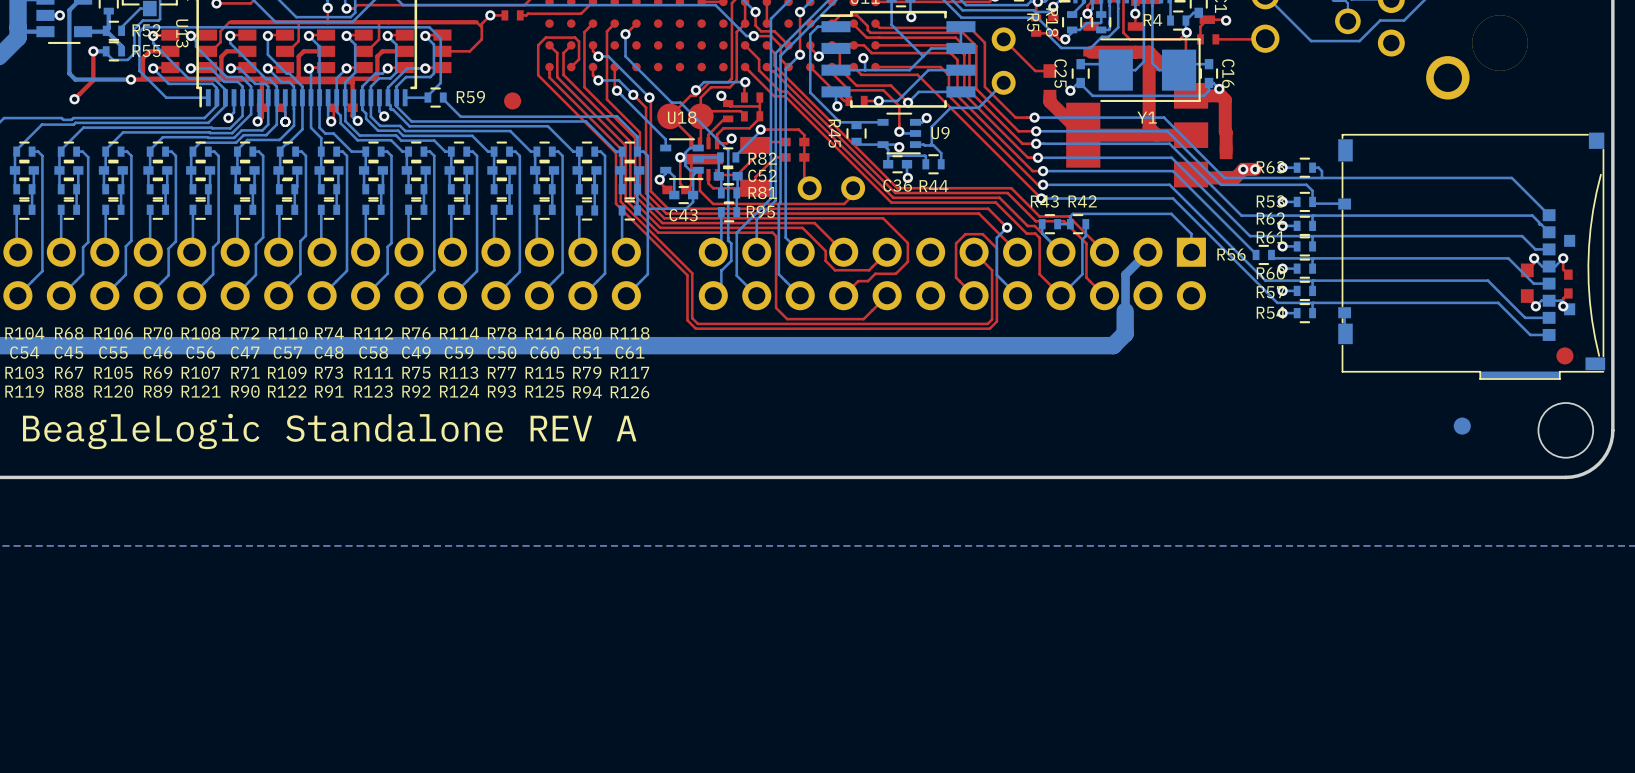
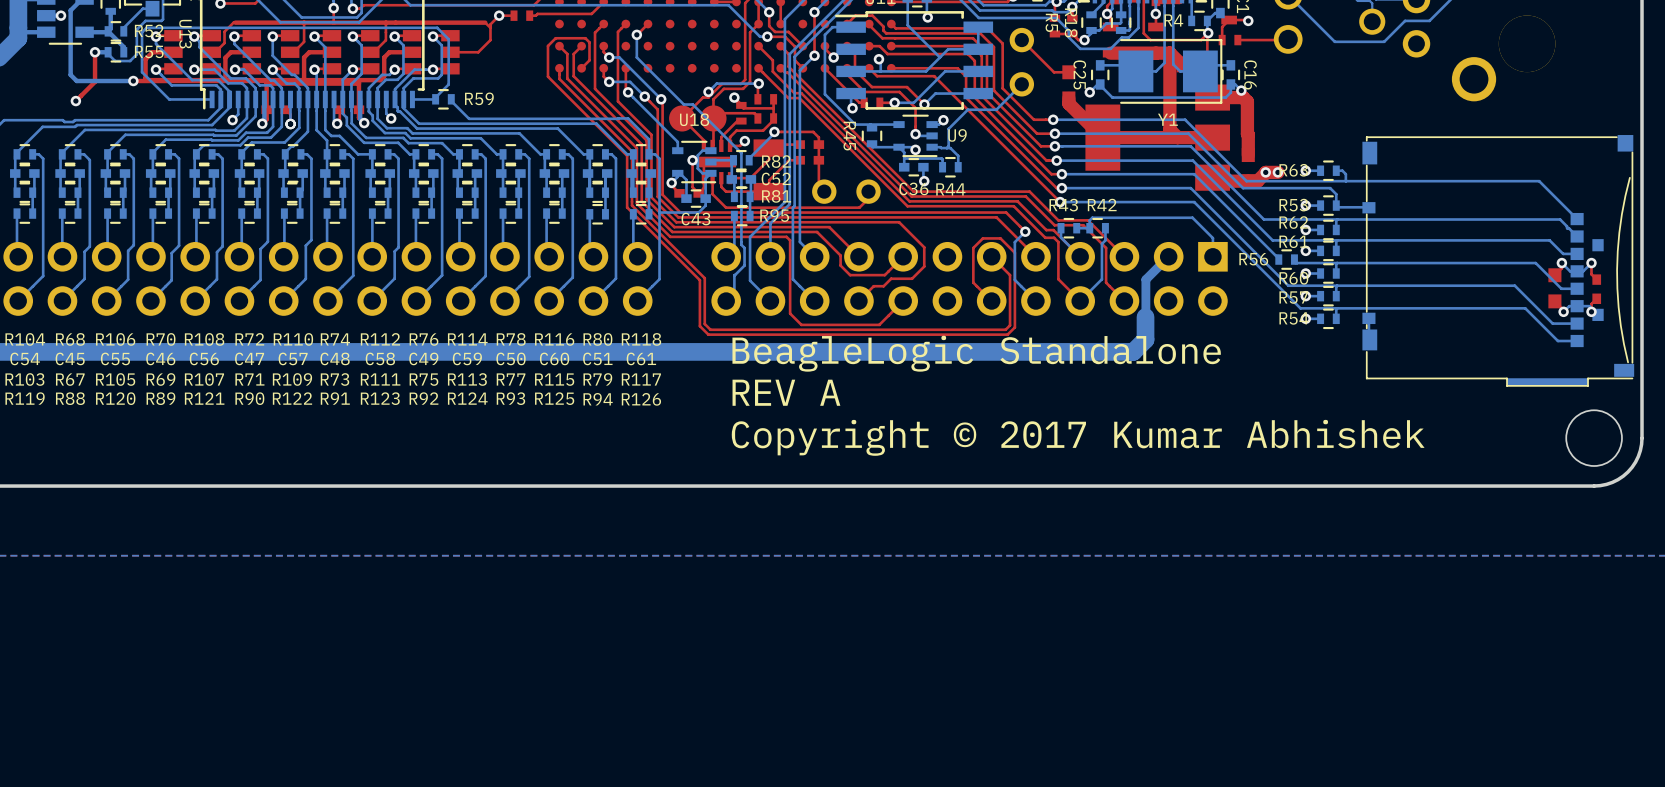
part: (512, 100) -> none
text: none -> BeagleLogic Standalone (976, 353)
part: (1564, 355) -> none
text: none -> REV A (786, 392)
part: (1462, 426) -> none
text: none -> Copyright © 2017 Kumar Abhishek (1078, 437)
text: BeagleLogic Standalone REV A (329, 431) -> none

